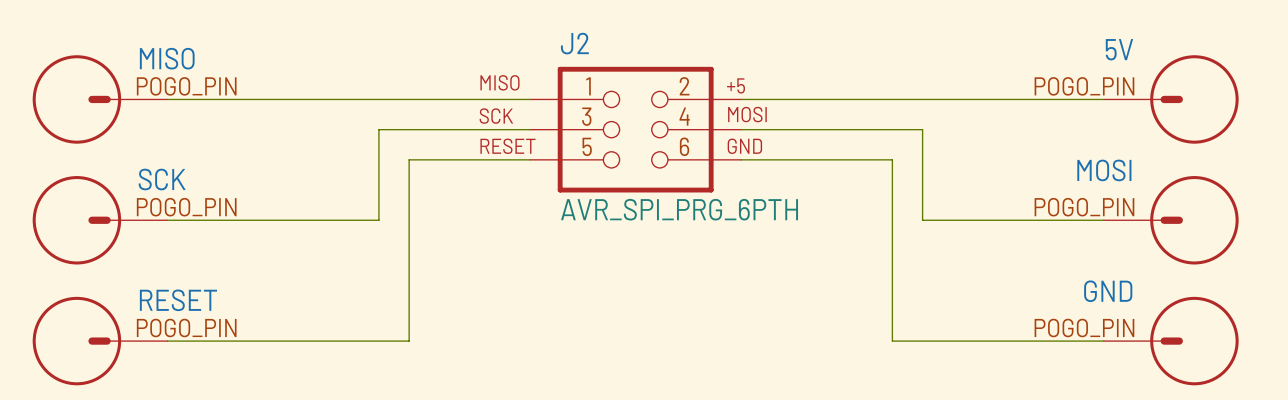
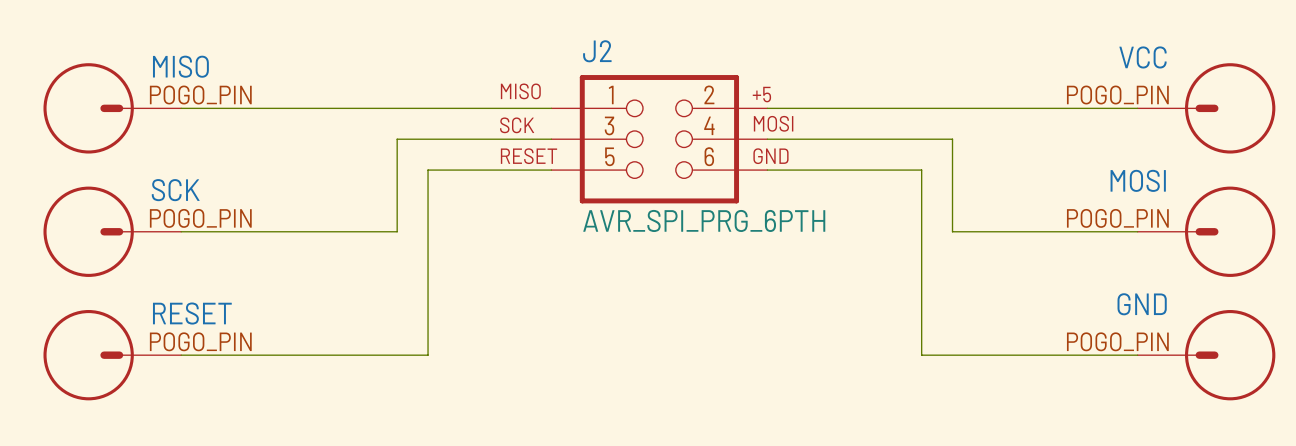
5V name: 5V (1119, 49) -> VCC (1143, 57)

